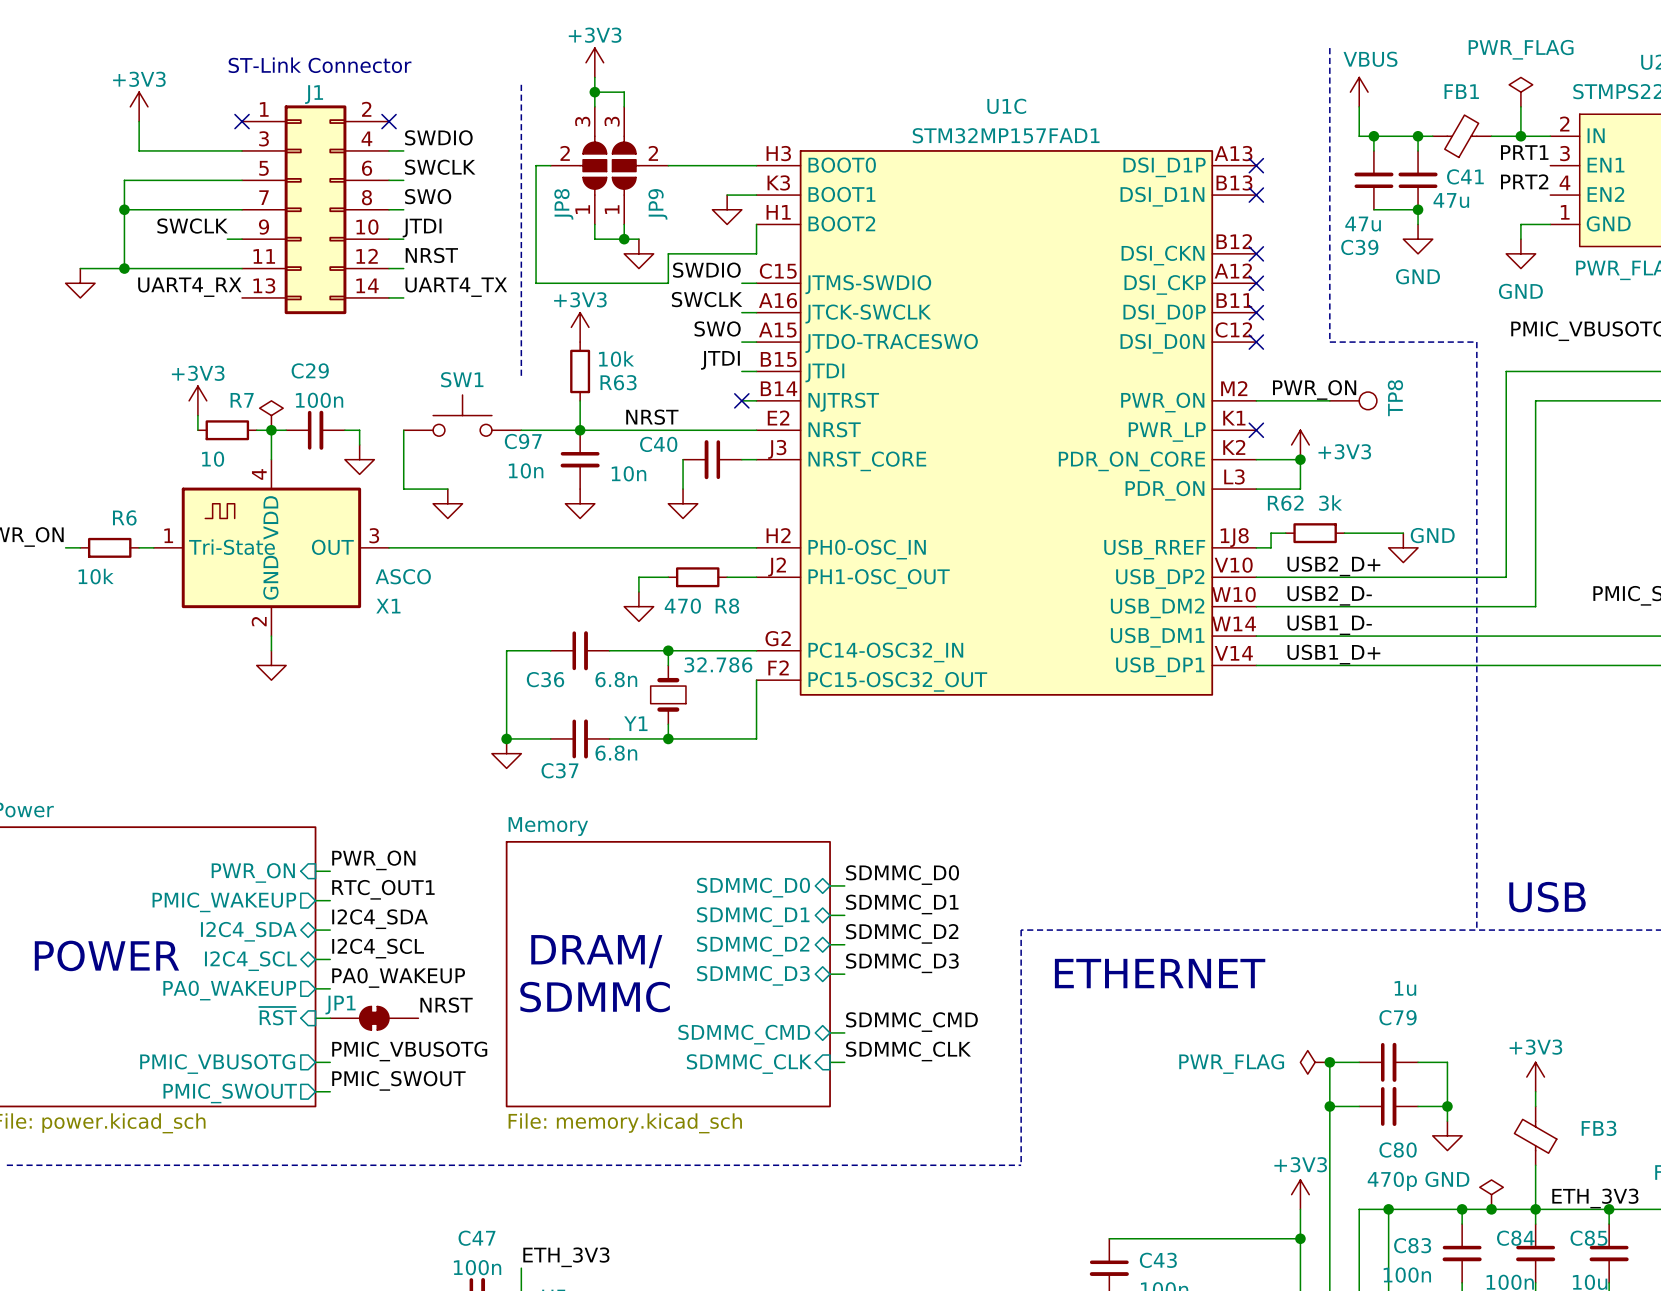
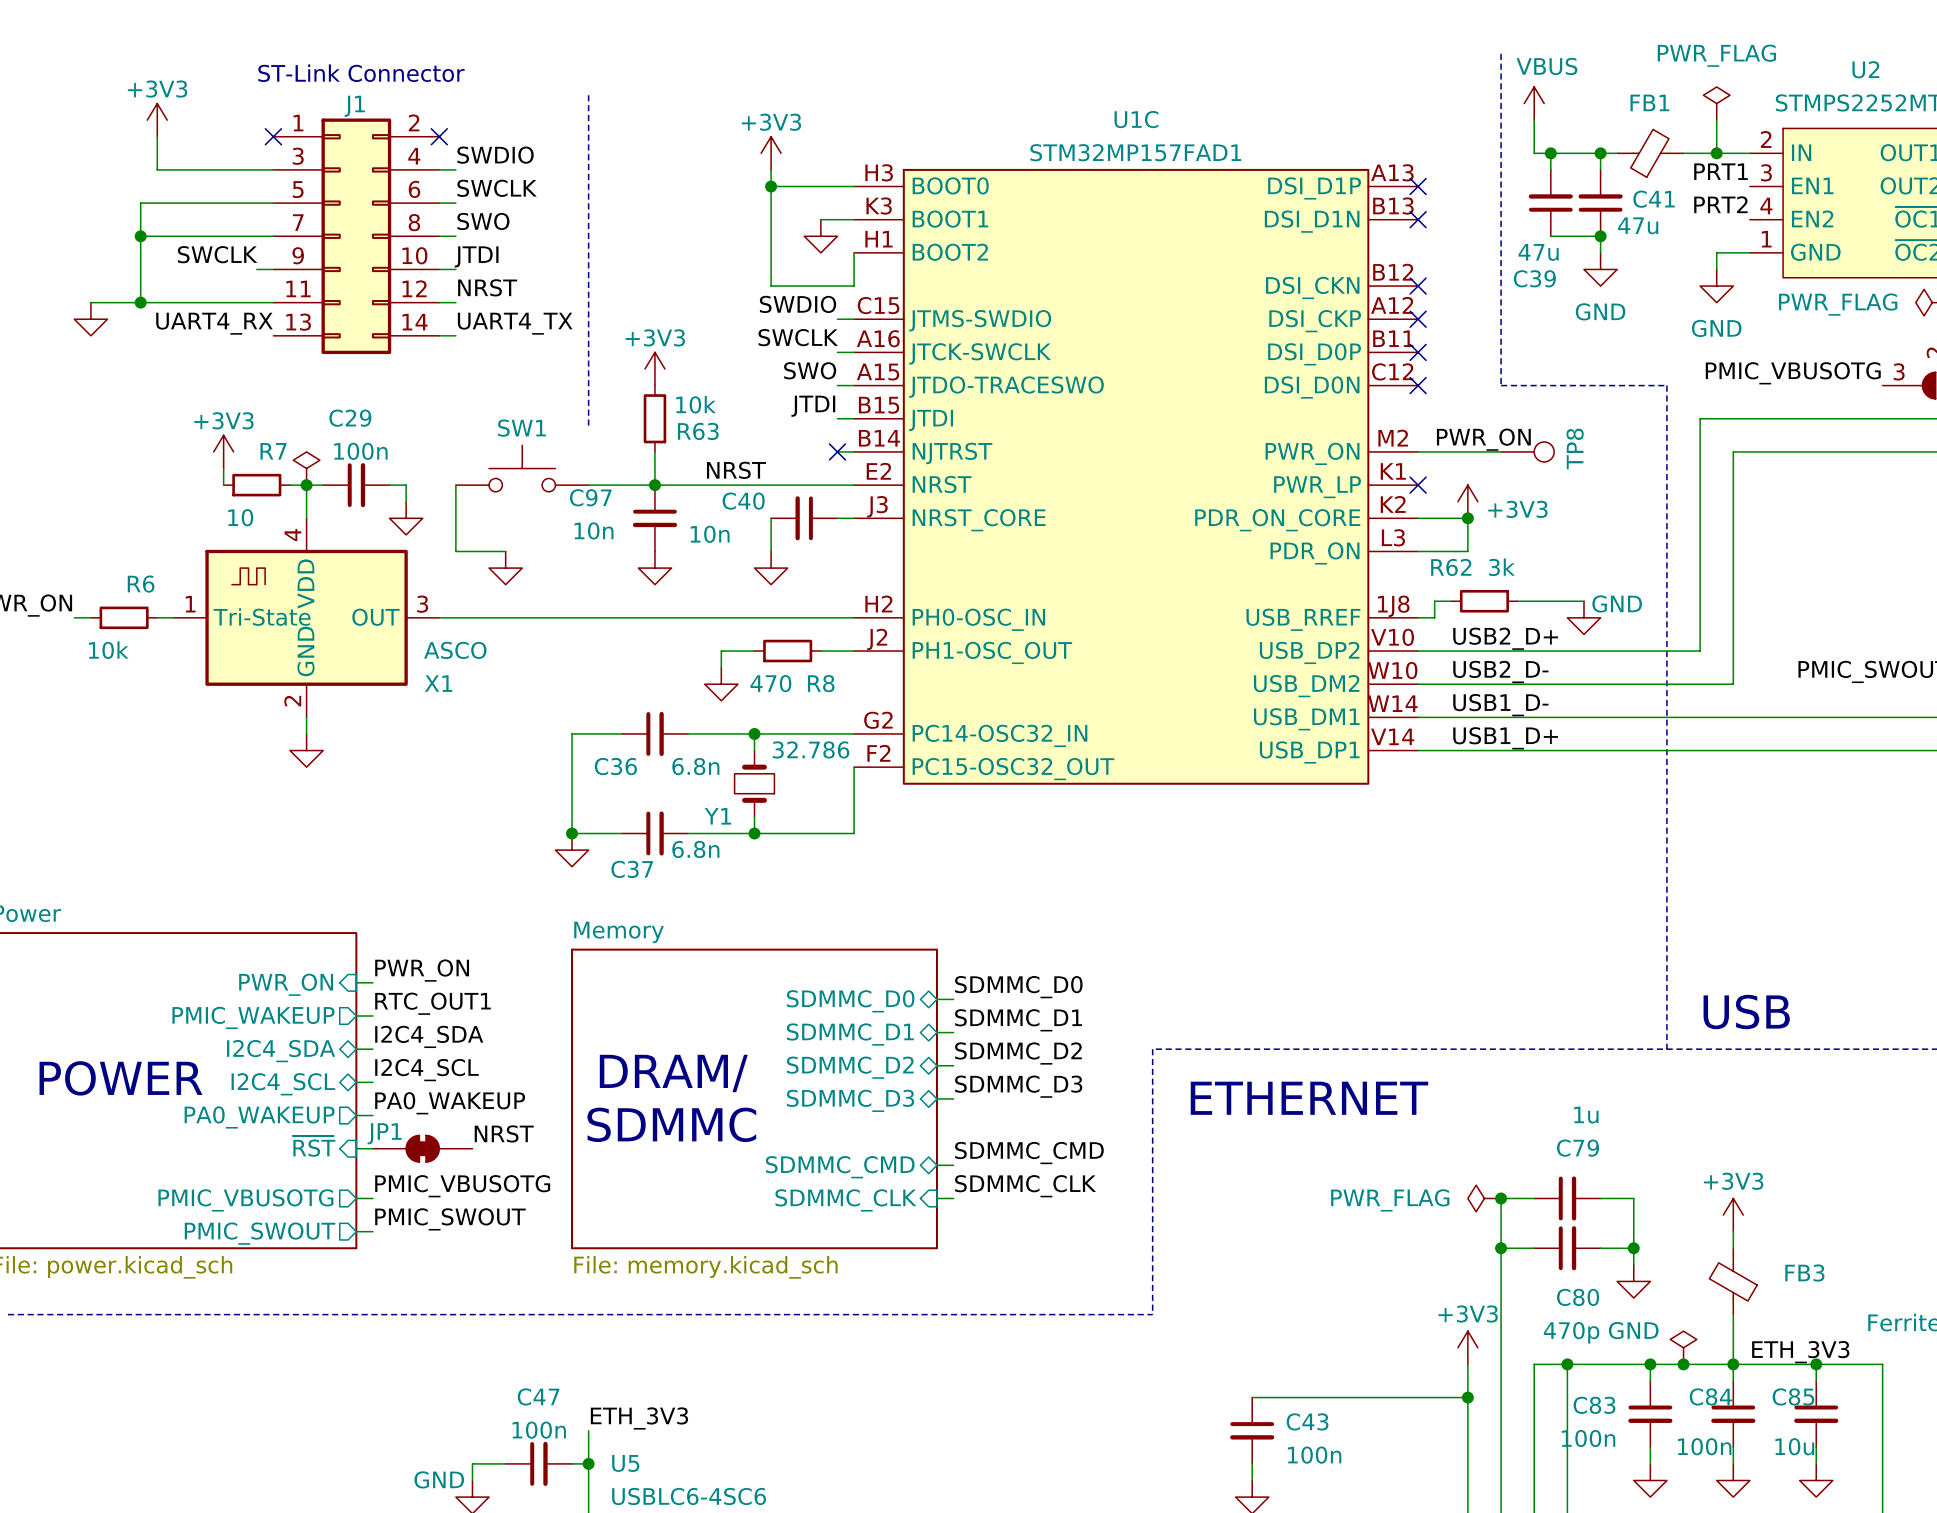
power symbol position: +3V3 (594, 62) -> +3V3 (771, 153)
wire: (594, 77) (594, 106) -> none
wire: (594, 92) (624, 92) (624, 106) -> none
junction: (594, 92) -> none
wire: (550, 165) (536, 165) (536, 283) (668, 283) (668, 253) (683, 253) -> (771, 169) (771, 286)
JP8: (578, 165) -> none
JP9: (640, 165) -> none
wire: (668, 165) (683, 165) -> none
junction: none -> (771, 186)
wire: (594, 224) (594, 239) (638, 239) -> none
wire: (624, 224) (624, 239) -> none
junction: (624, 239) -> none
power symbol: (638, 253) -> none

